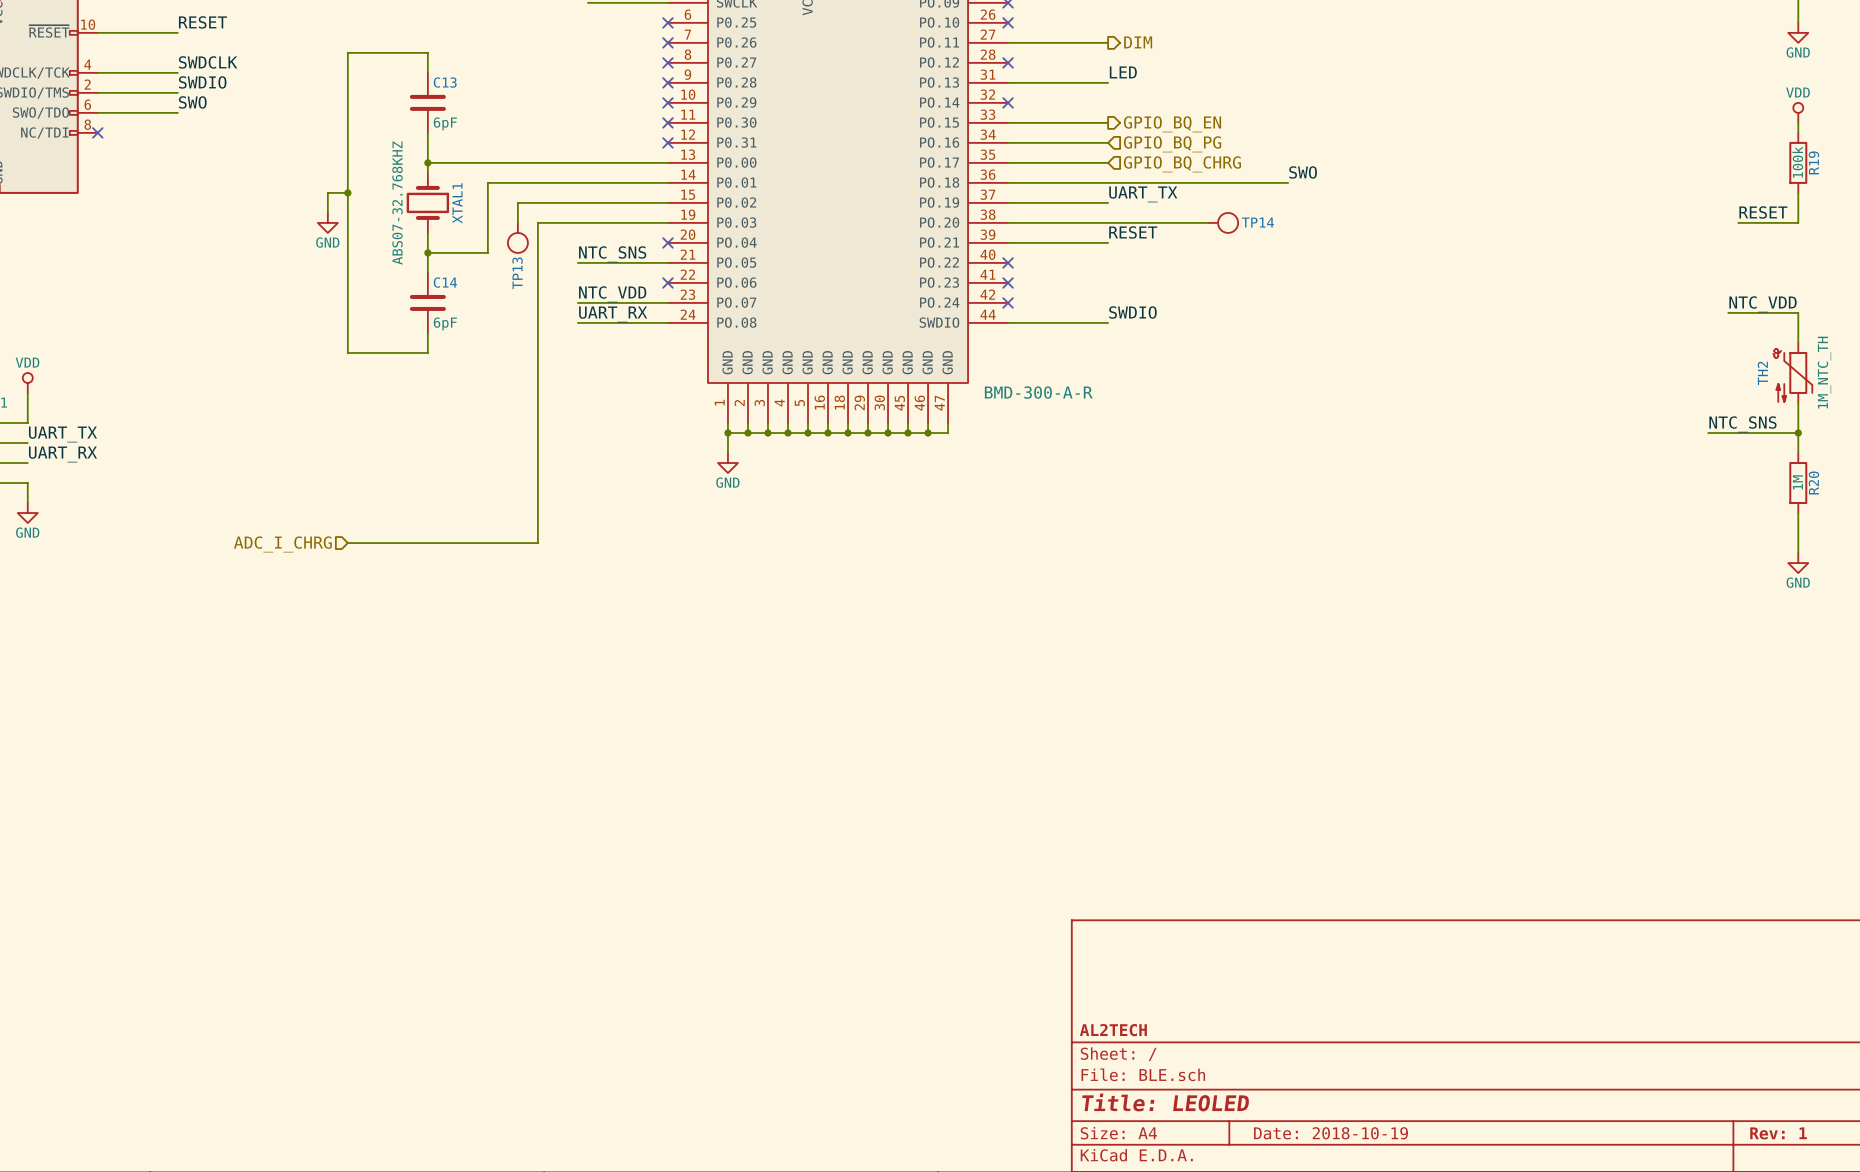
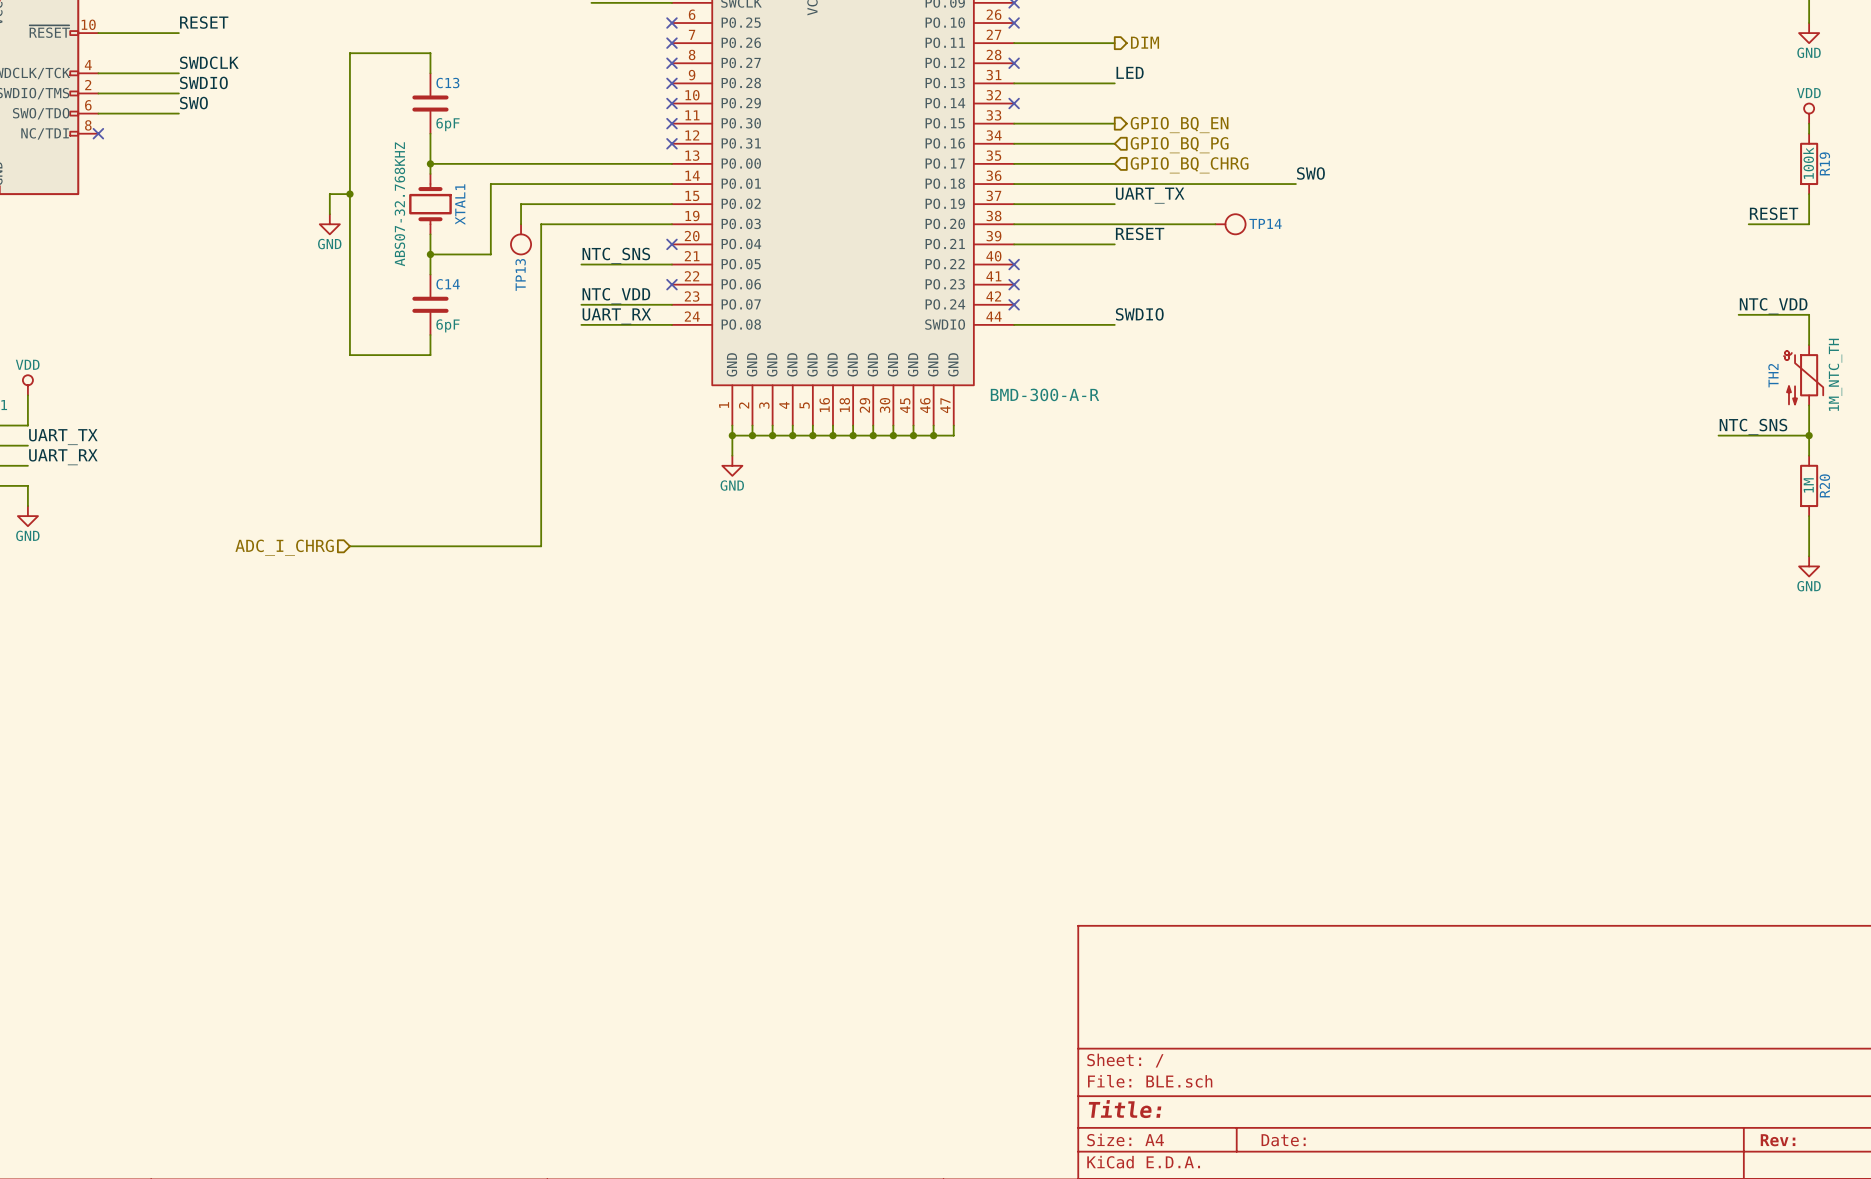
title block: AL2TECH (1113, 1030) -> none
title block: Title: LEOLED (1165, 1102) -> Title: (1125, 1109)
title block: Date: 2018-10-19 (1330, 1133) -> Date: (1283, 1140)
title block: Rev: 1 (1778, 1133) -> Rev: (1778, 1140)

